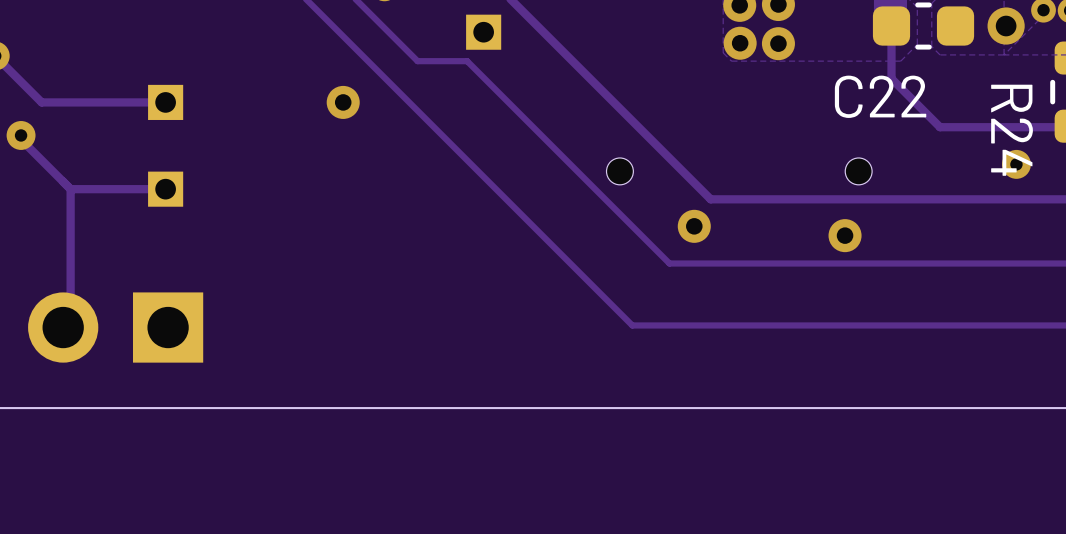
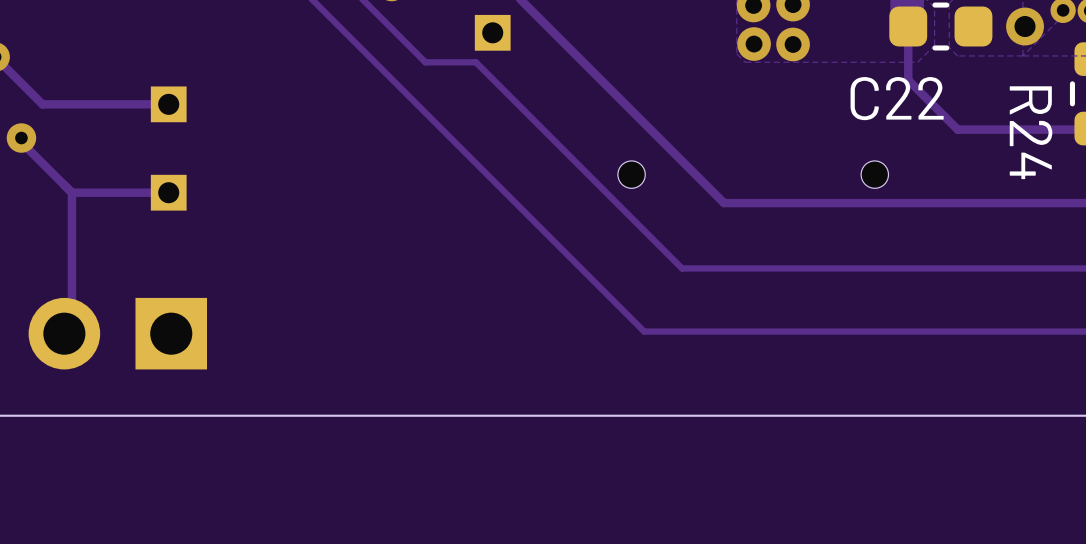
via: (343, 102) -> none
via: (1016, 164) -> none
via: (694, 226) -> none
via: (845, 235) -> none

